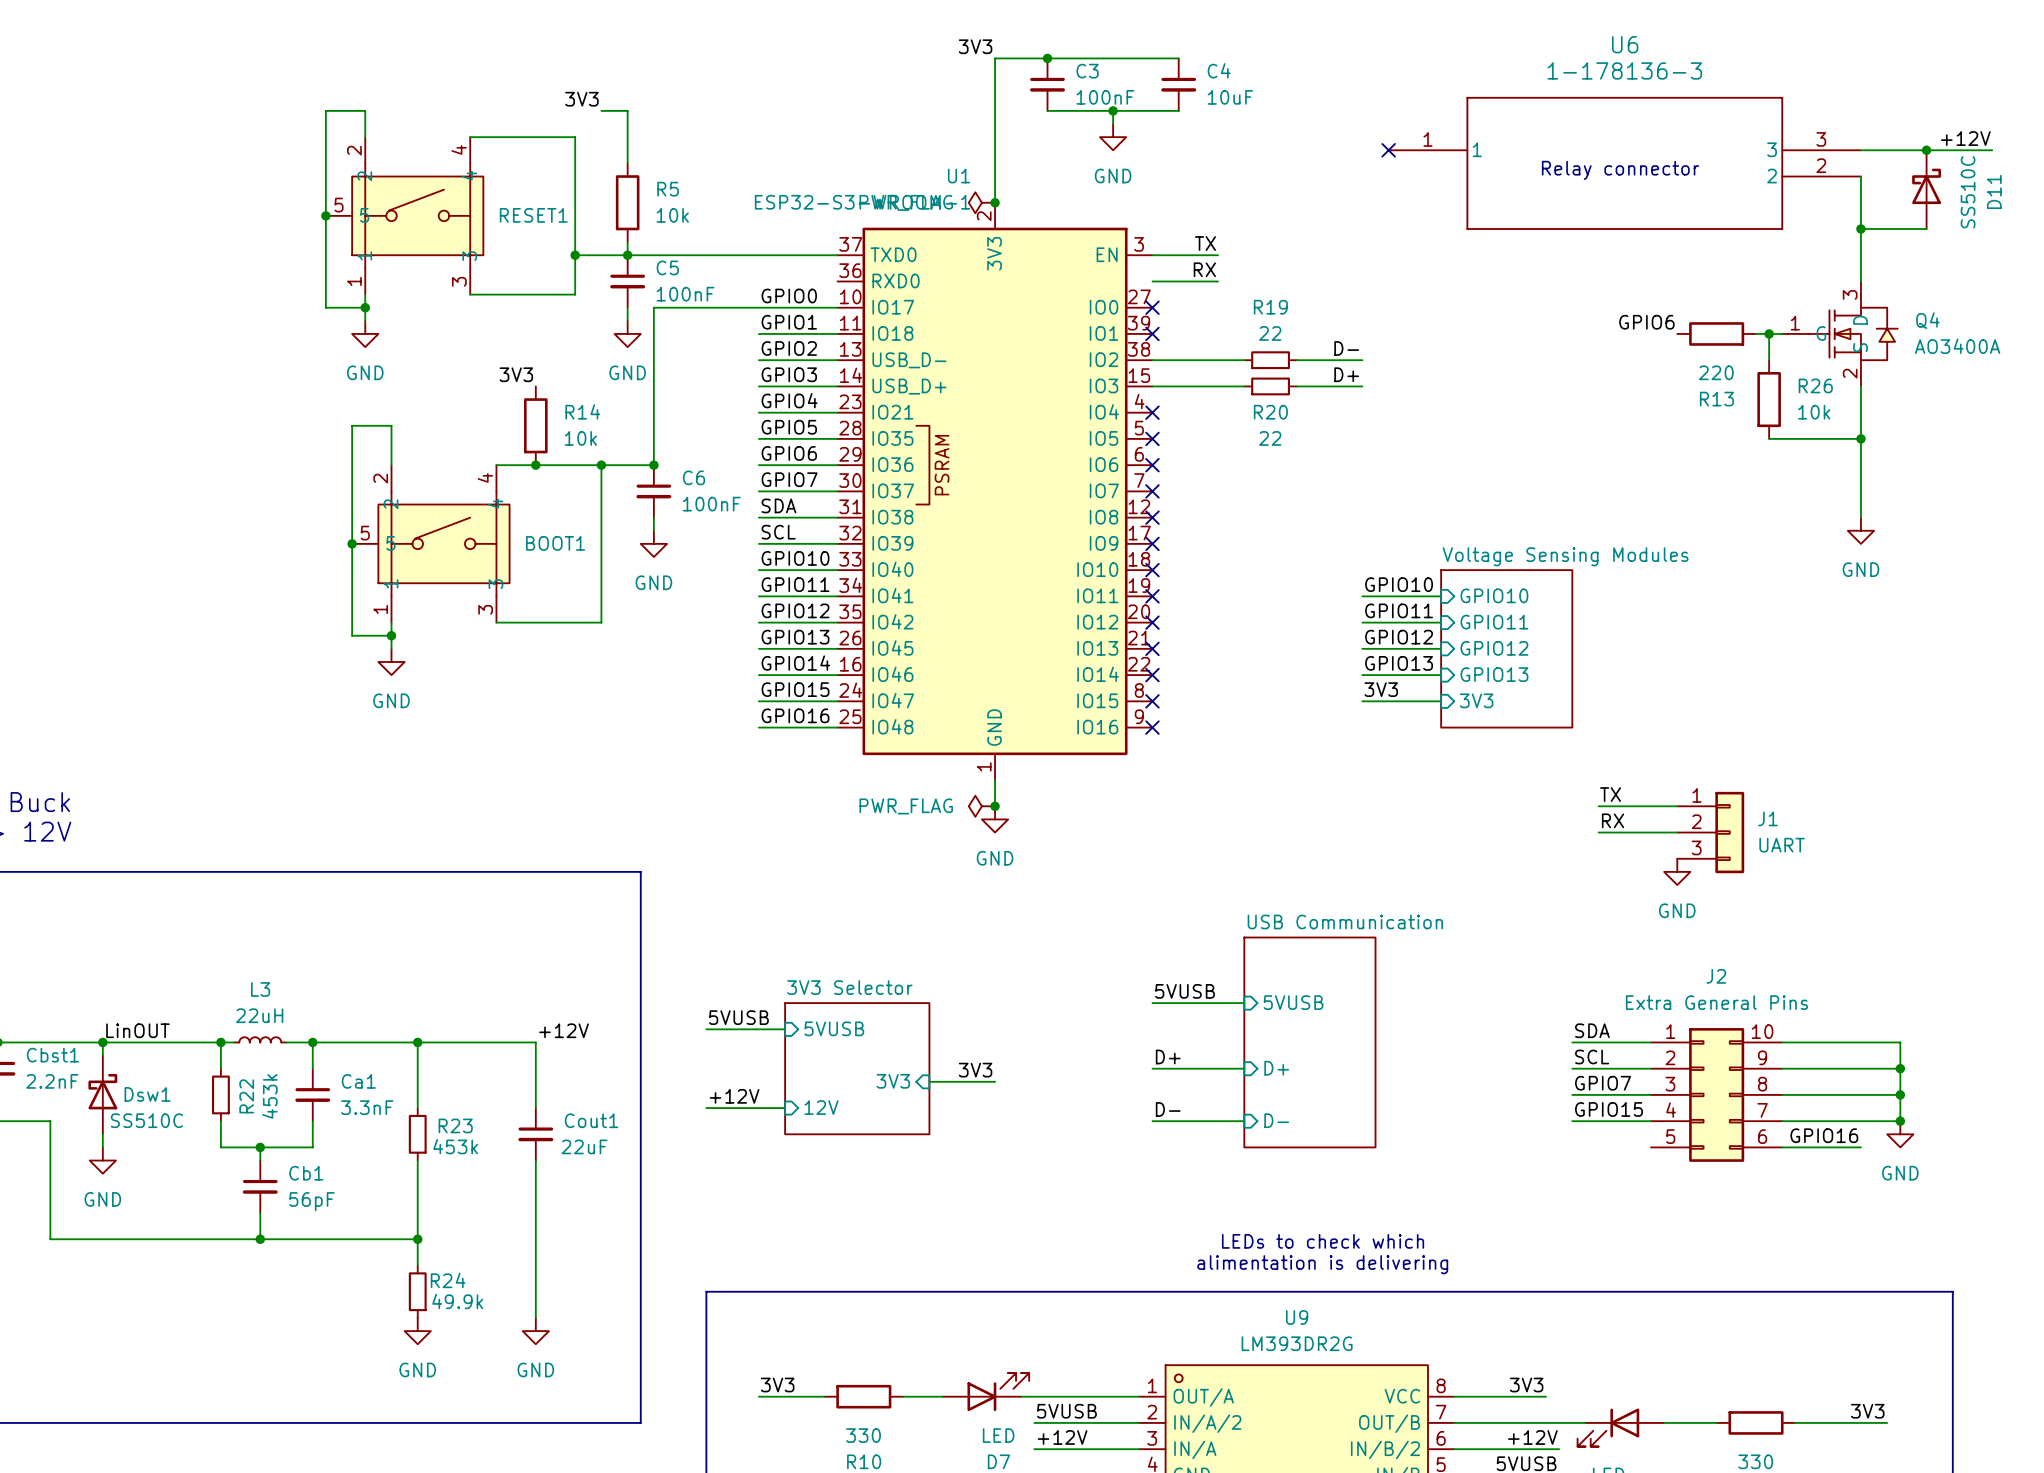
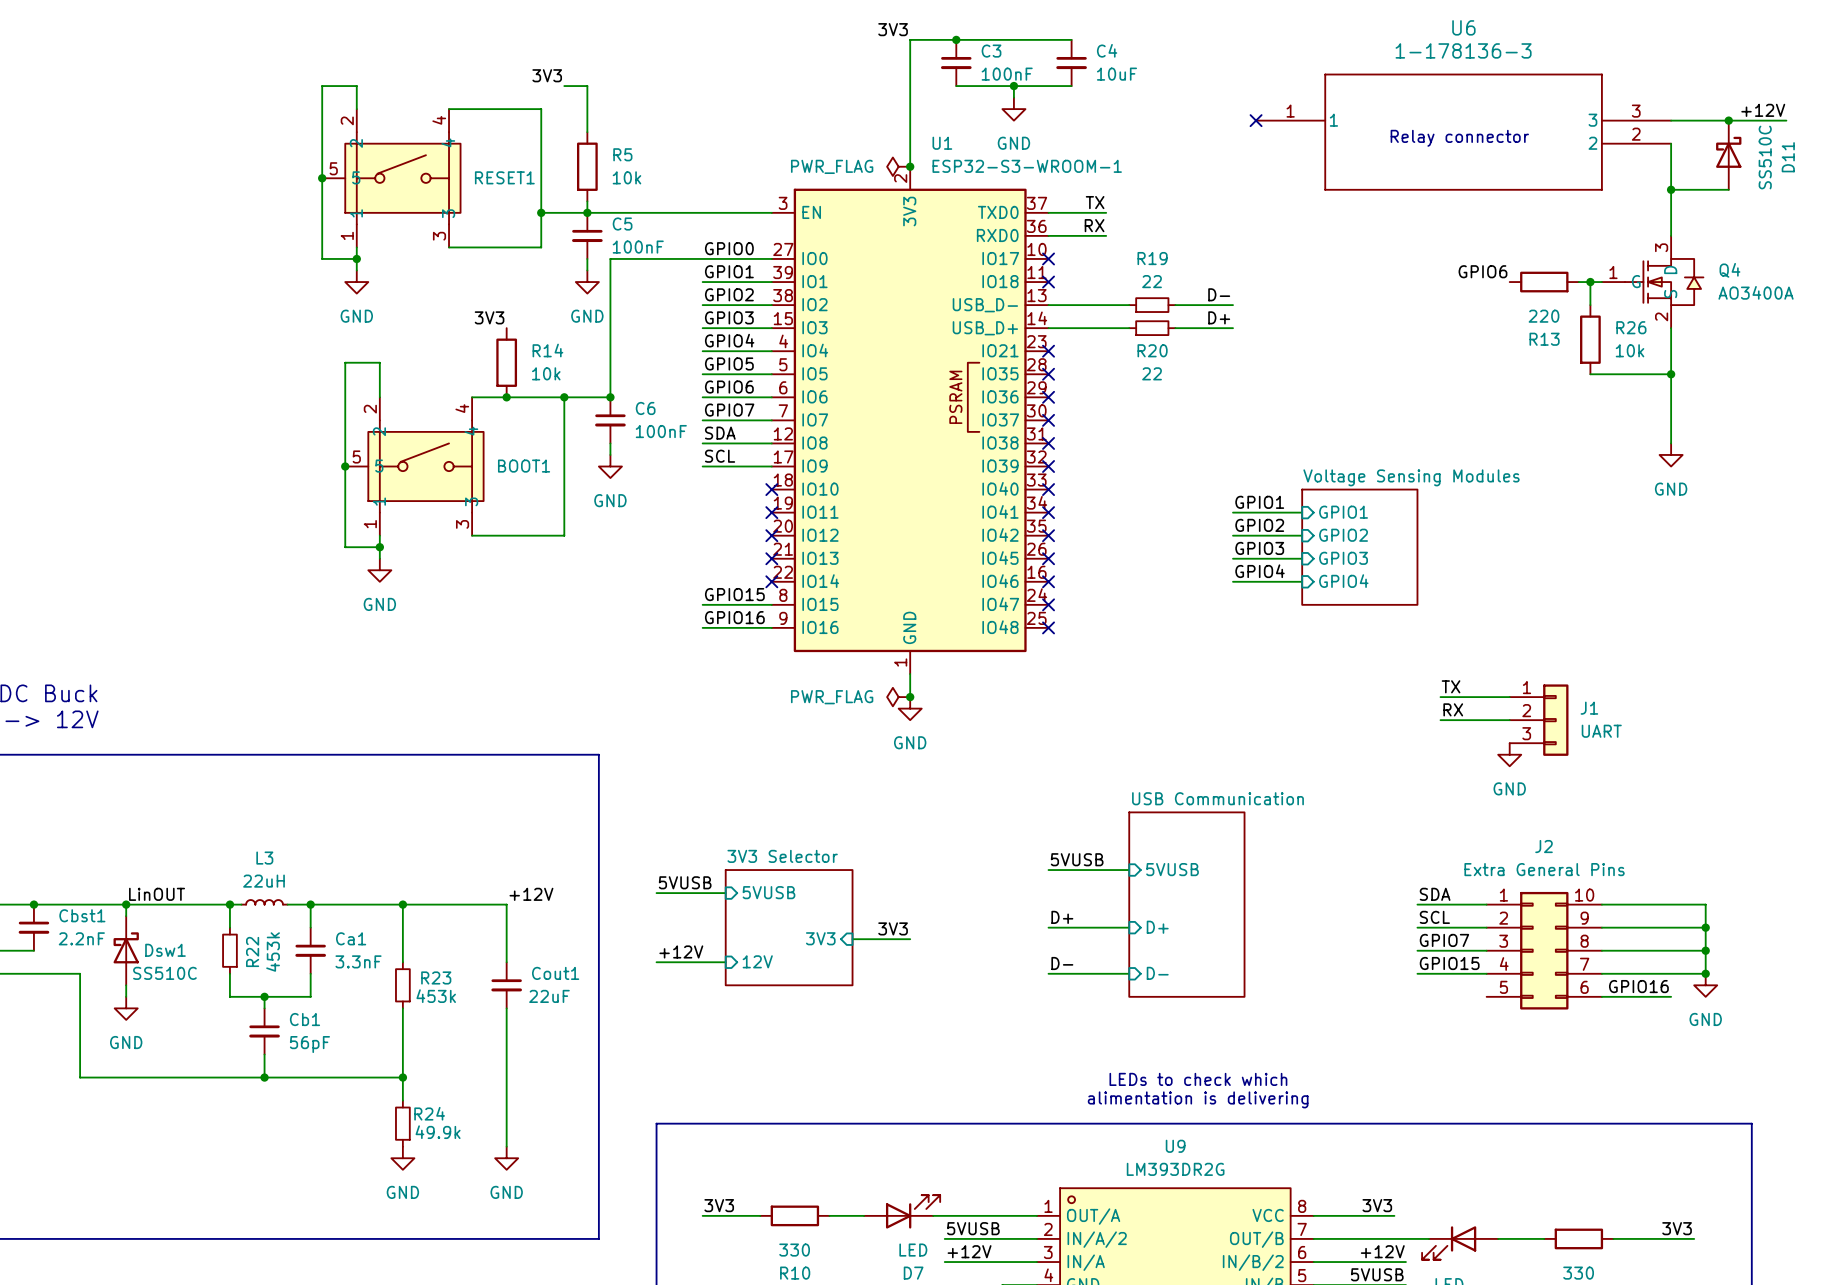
U1 flip: as is (995, 491) -> left-right (910, 420)
label: GPIO10 (795, 558) -> none
wire: (758, 570) (837, 570) -> none
no-connect mark: none -> (771, 489)
label: GPIO11 (795, 584) -> none
label: GPIO10 (1399, 584) -> GPIO1 (1259, 502)
sheet pin: GPIO10 (1494, 595) -> GPIO1 (1343, 512)
wire: (758, 596) (837, 596) -> none
no-connect mark: none -> (771, 512)
label: GPIO12 (795, 610) -> none
label: GPIO11 (1399, 610) -> GPIO2 (1259, 525)
wire: (758, 622) (837, 622) -> none
no-connect mark: none -> (771, 535)
sheet pin: GPIO11 (1494, 622) -> GPIO2 (1343, 535)
sheet Voltage Sensing Modules: none -> (1359, 547)
label: GPIO13 (795, 637) -> none
label: GPIO12 (1399, 637) -> GPIO3 (1259, 548)
wire: (758, 648) (837, 648) -> none
no-connect mark: none -> (771, 558)
sheet pin: GPIO12 (1494, 648) -> GPIO3 (1343, 558)
sheet Voltage Sensing Modules: (1506, 648) -> none
label: GPIO14 (795, 663) -> none
label: GPIO13 (1399, 663) -> GPIO4 (1259, 571)
sheet pin: GPIO13 (1494, 674) -> GPIO4 (1343, 581)
wire: (758, 675) (837, 675) -> none
no-connect mark: none -> (771, 581)
label: 3V3 (1381, 689) -> none
sheet pin: 3V3 (1476, 700) -> none
wire: (1362, 701) (1441, 701) -> none

